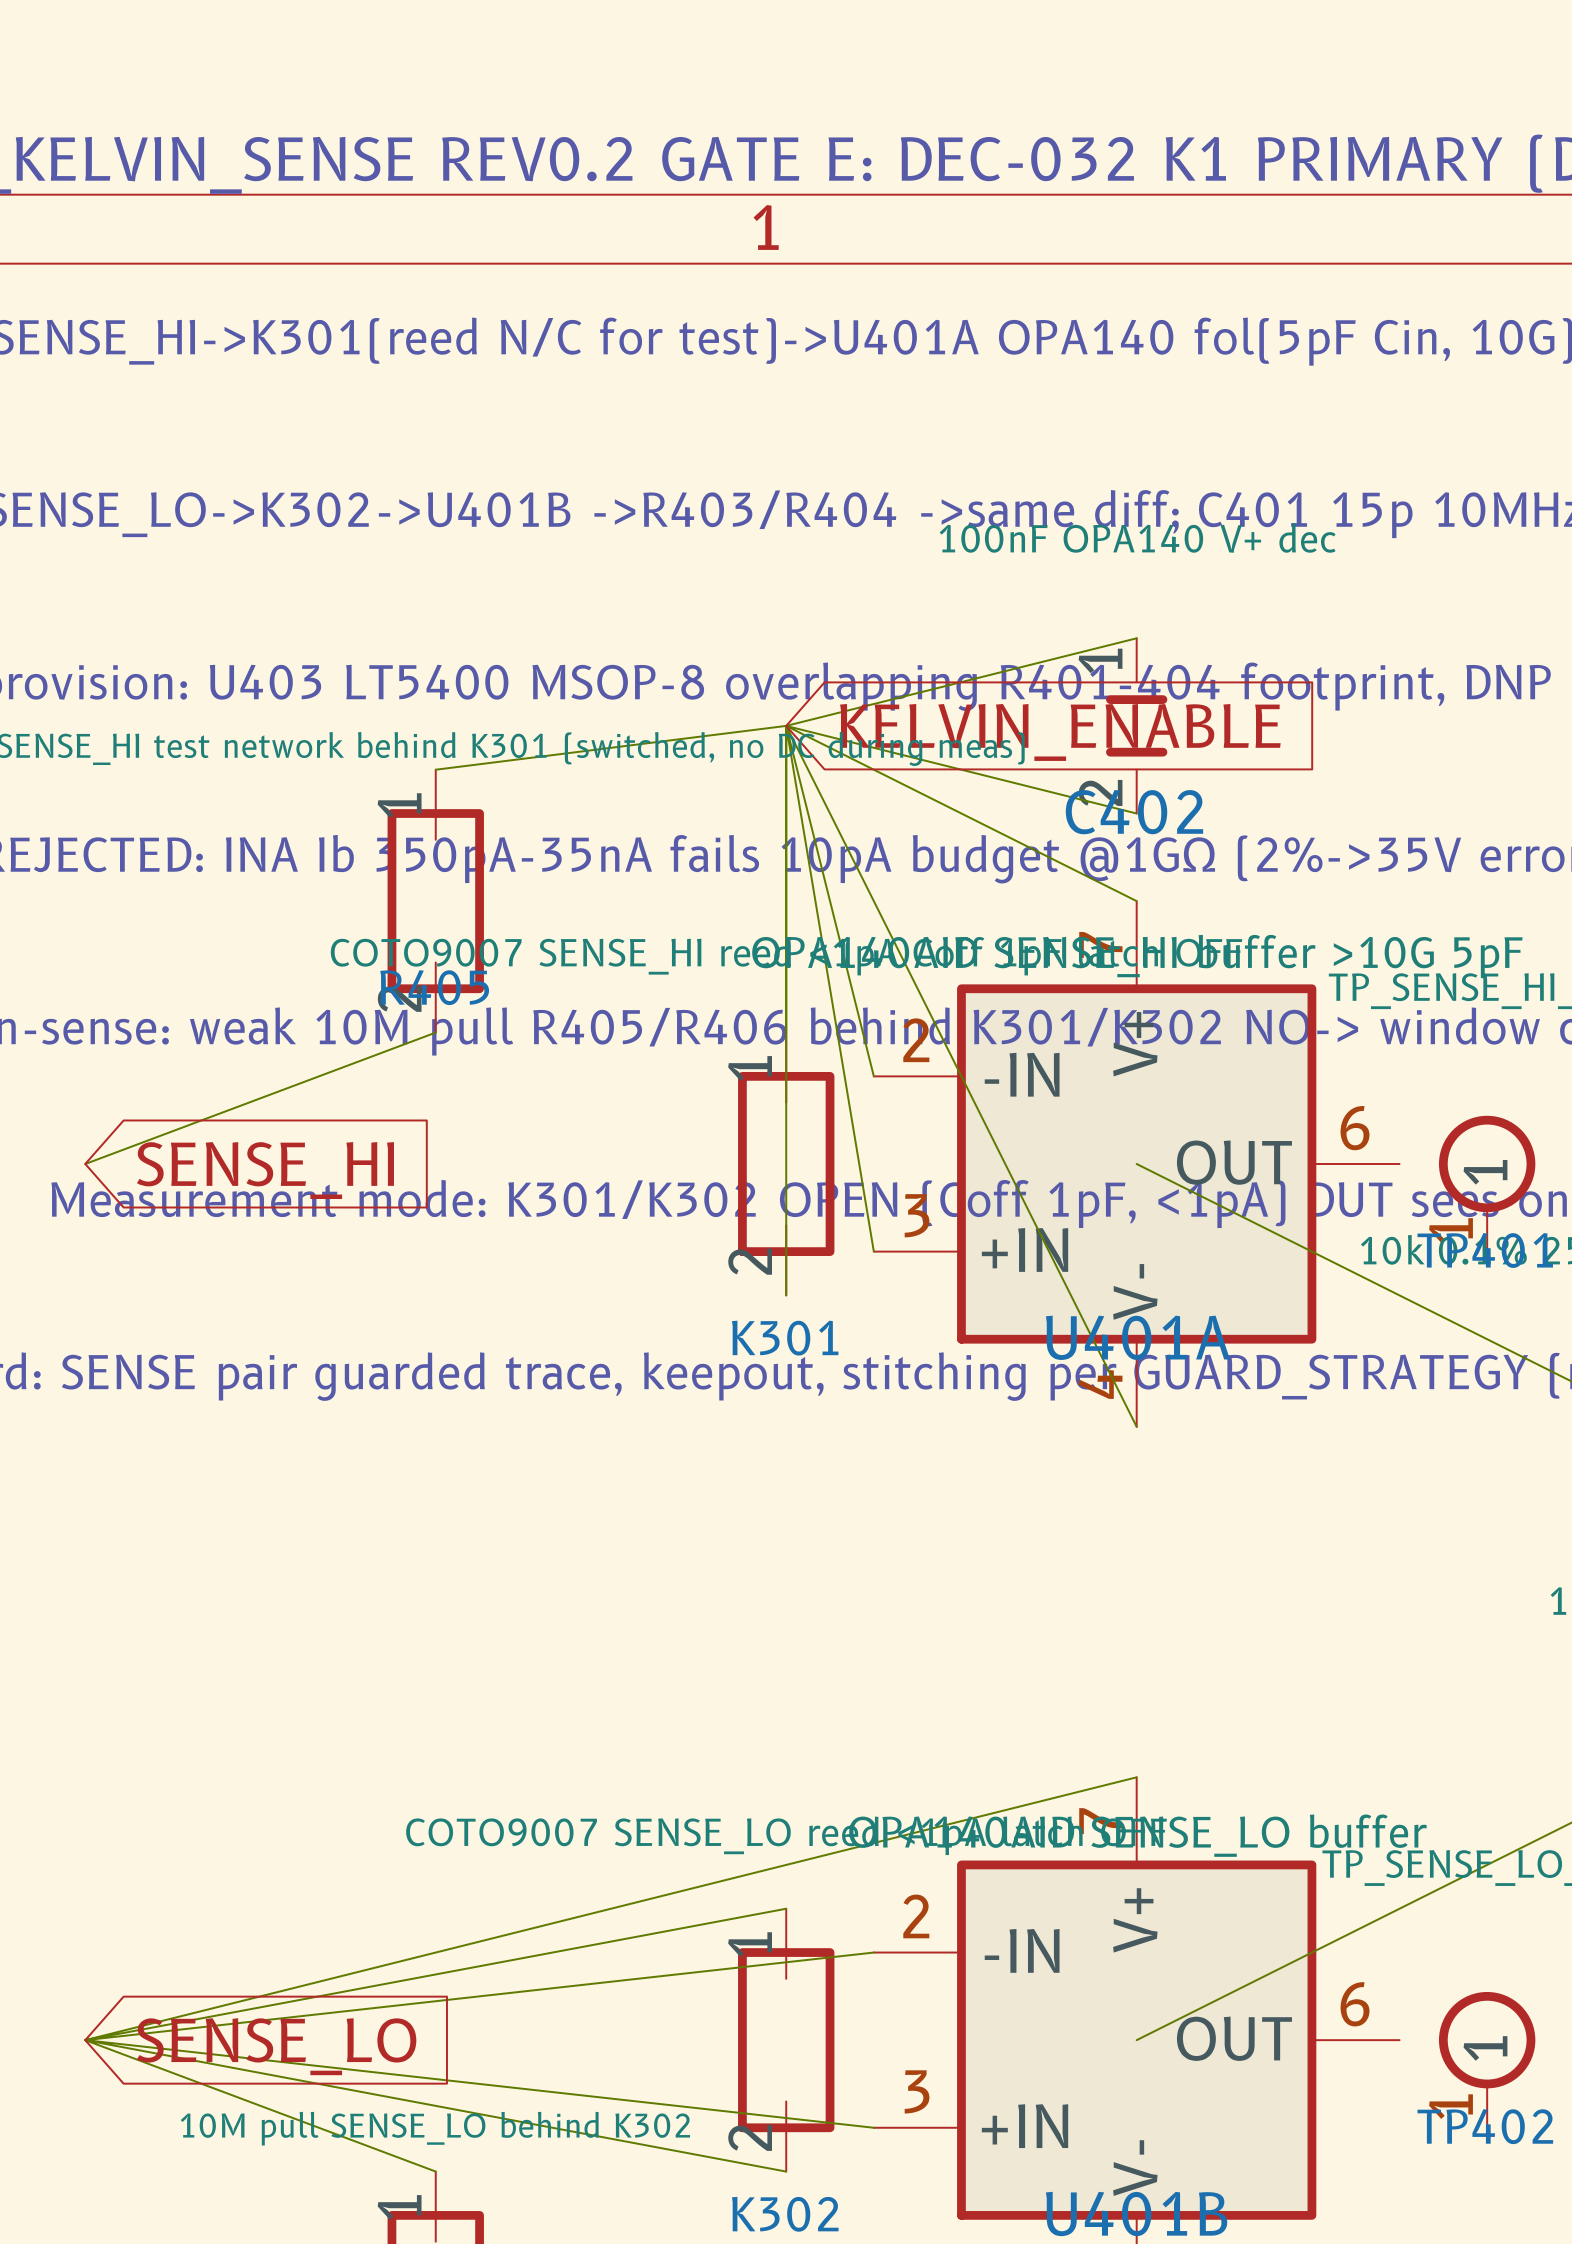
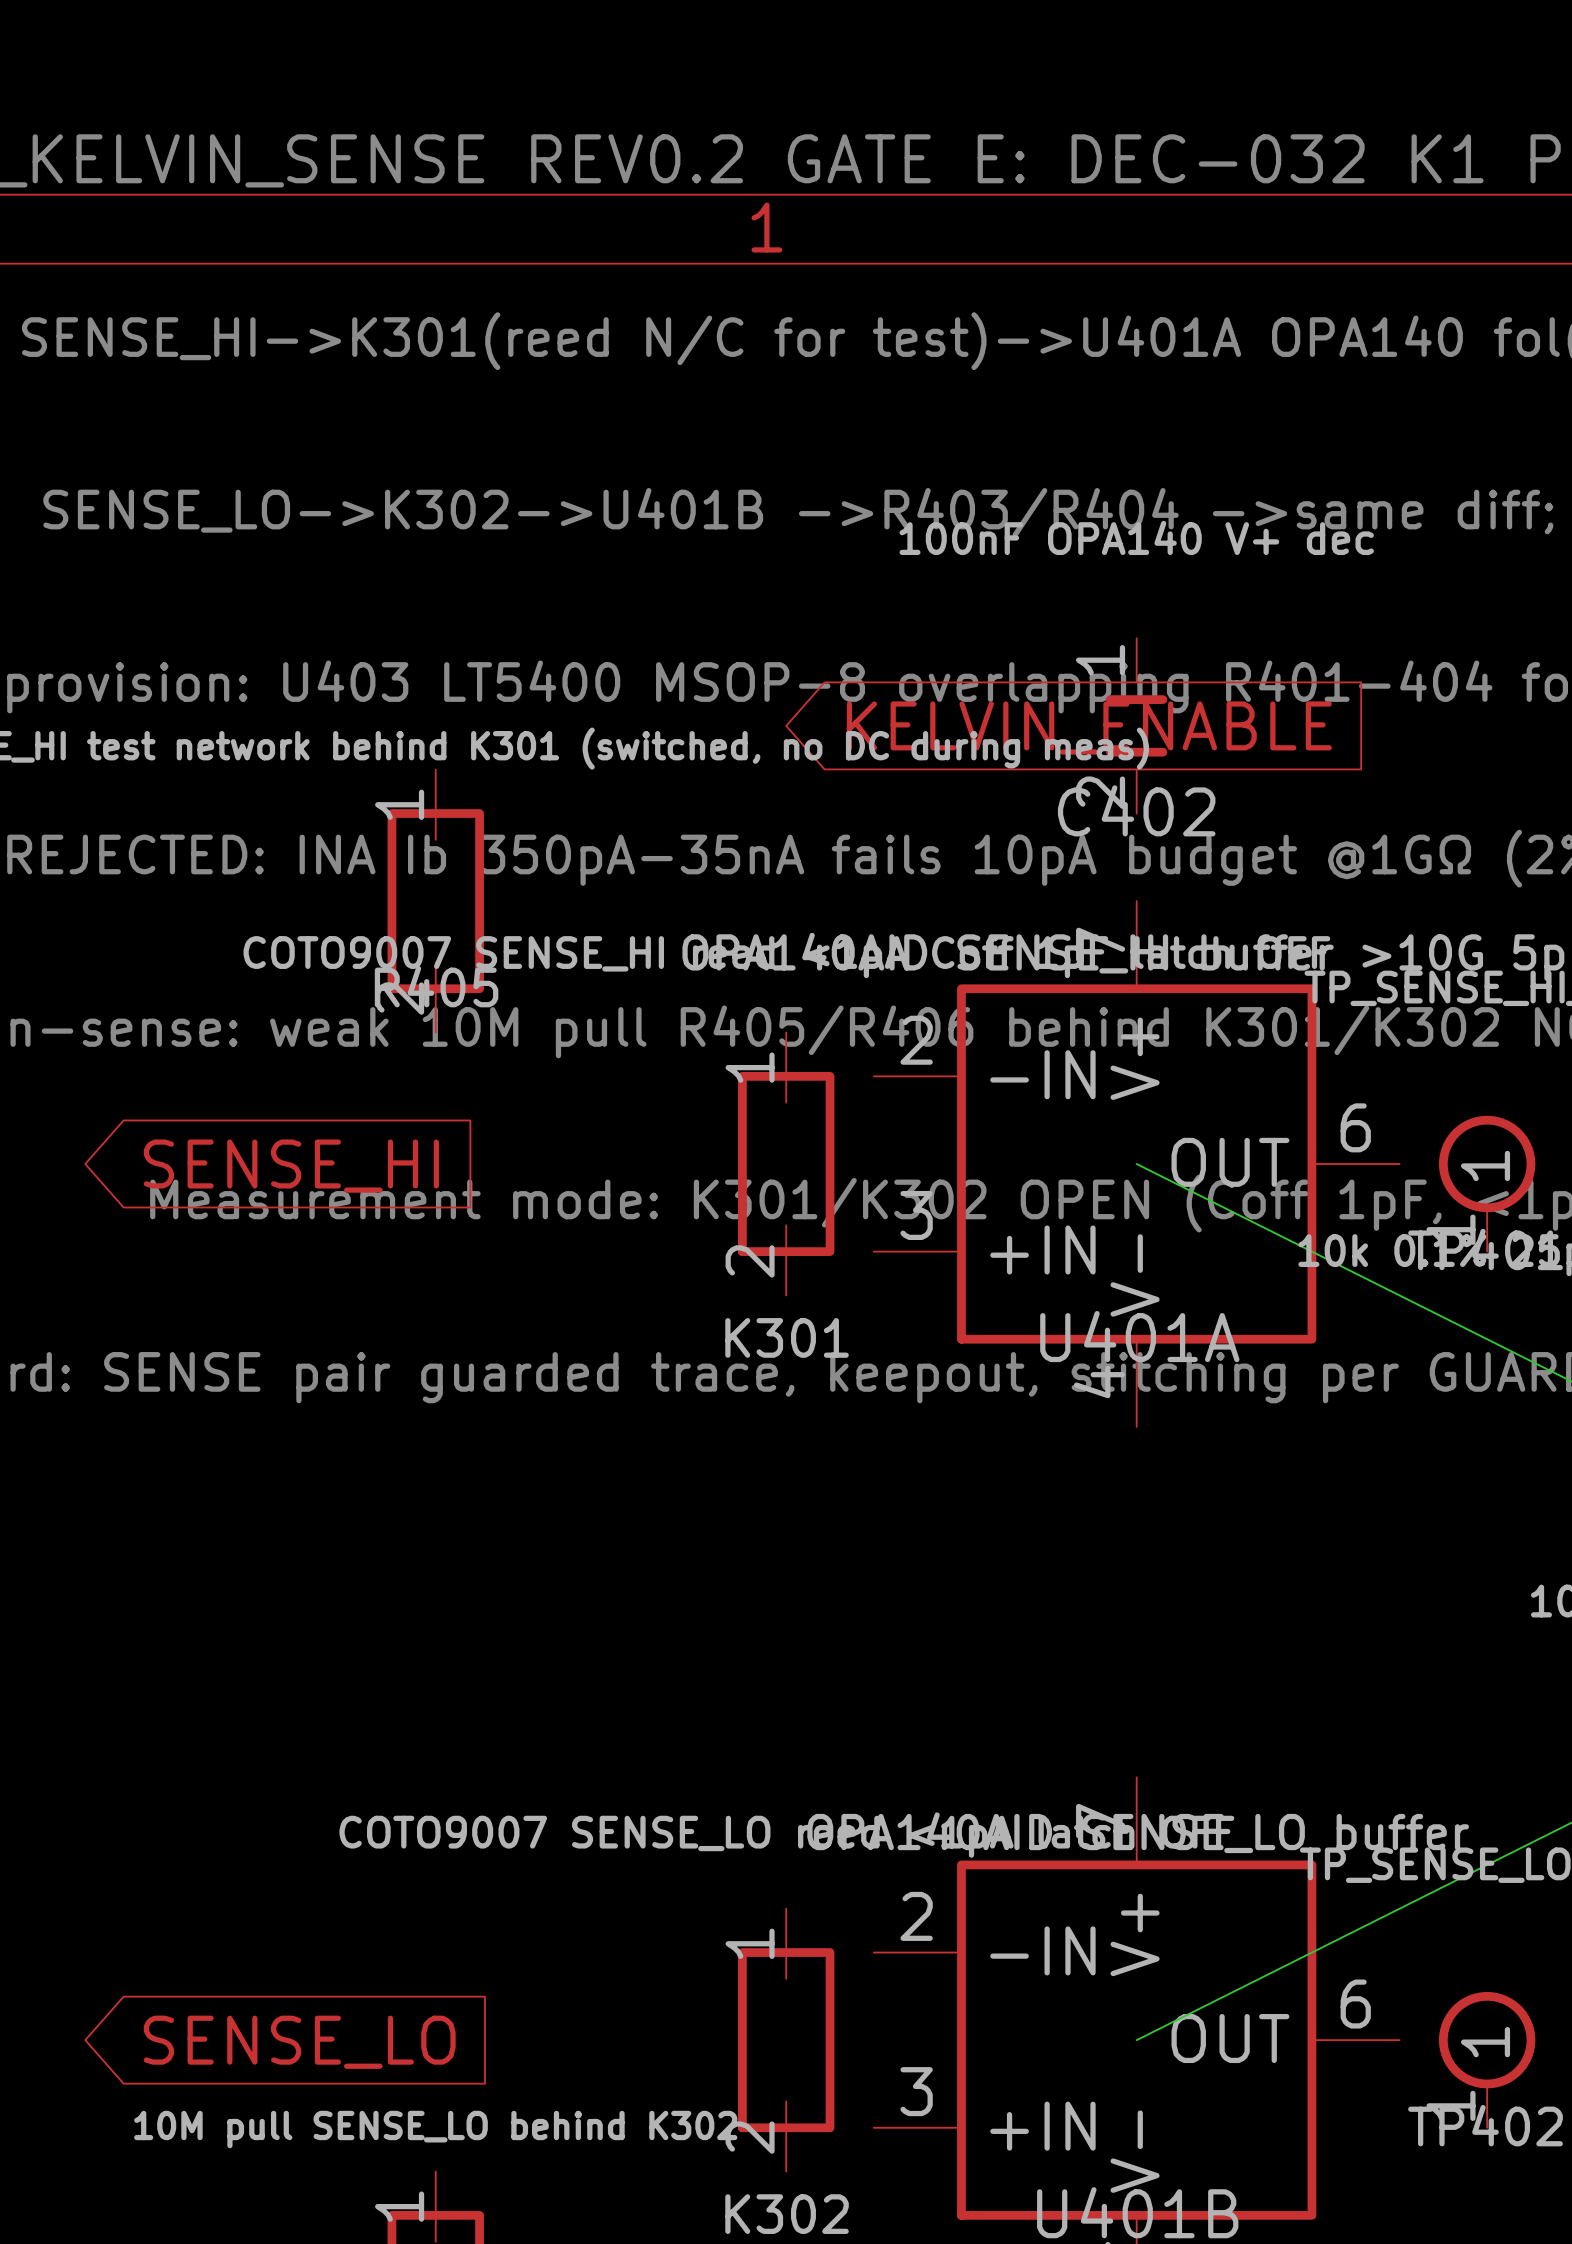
wire: (1136, 638) (786, 725) -> none
wire: (786, 725) (873, 1251) -> none
wire: (786, 725) (873, 1076) -> none
wire: (786, 725) (1136, 1426) -> none
wire: (786, 725) (1136, 901) -> none
wire: (786, 725) (786, 1295) -> none
wire: (786, 725) (435, 769) -> none
wire: (786, 725) (1136, 813) -> none
wire: (435, 1032) (85, 1163) -> none
wire: (1136, 1777) (85, 2040) -> none
wire: (786, 1908) (85, 2040) -> none
wire: (873, 1952) (85, 2040) -> none
wire: (85, 2040) (873, 2127) -> none
wire: (85, 2040) (786, 2171) -> none
wire: (85, 2040) (435, 2171) -> none

